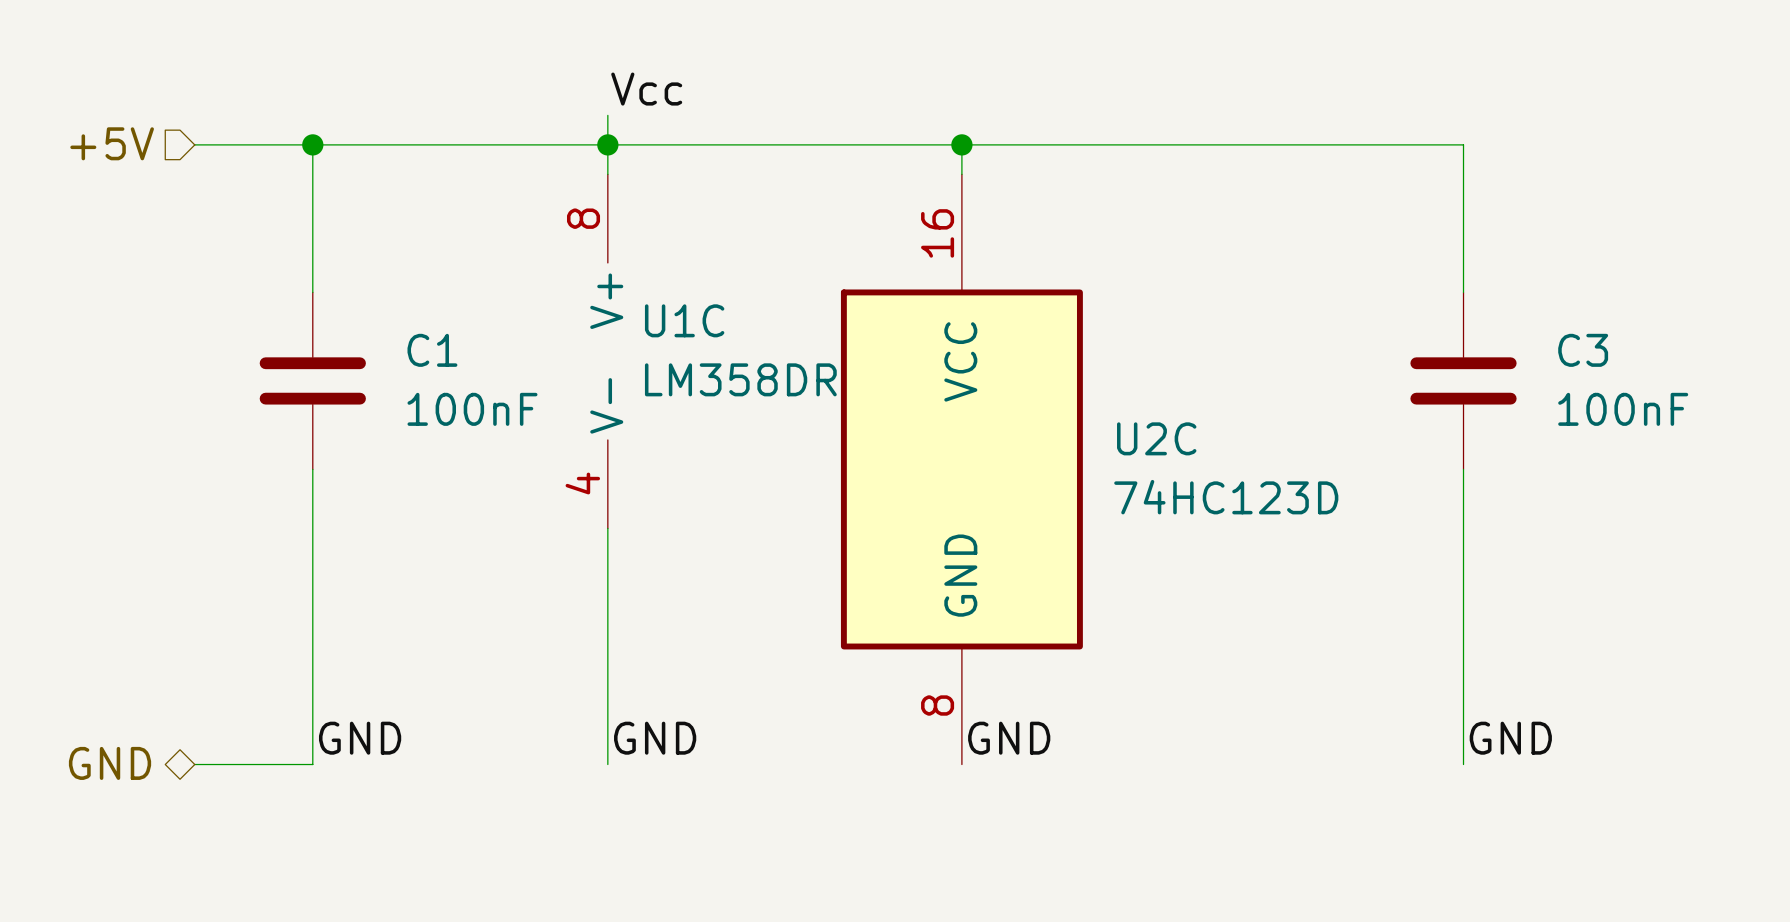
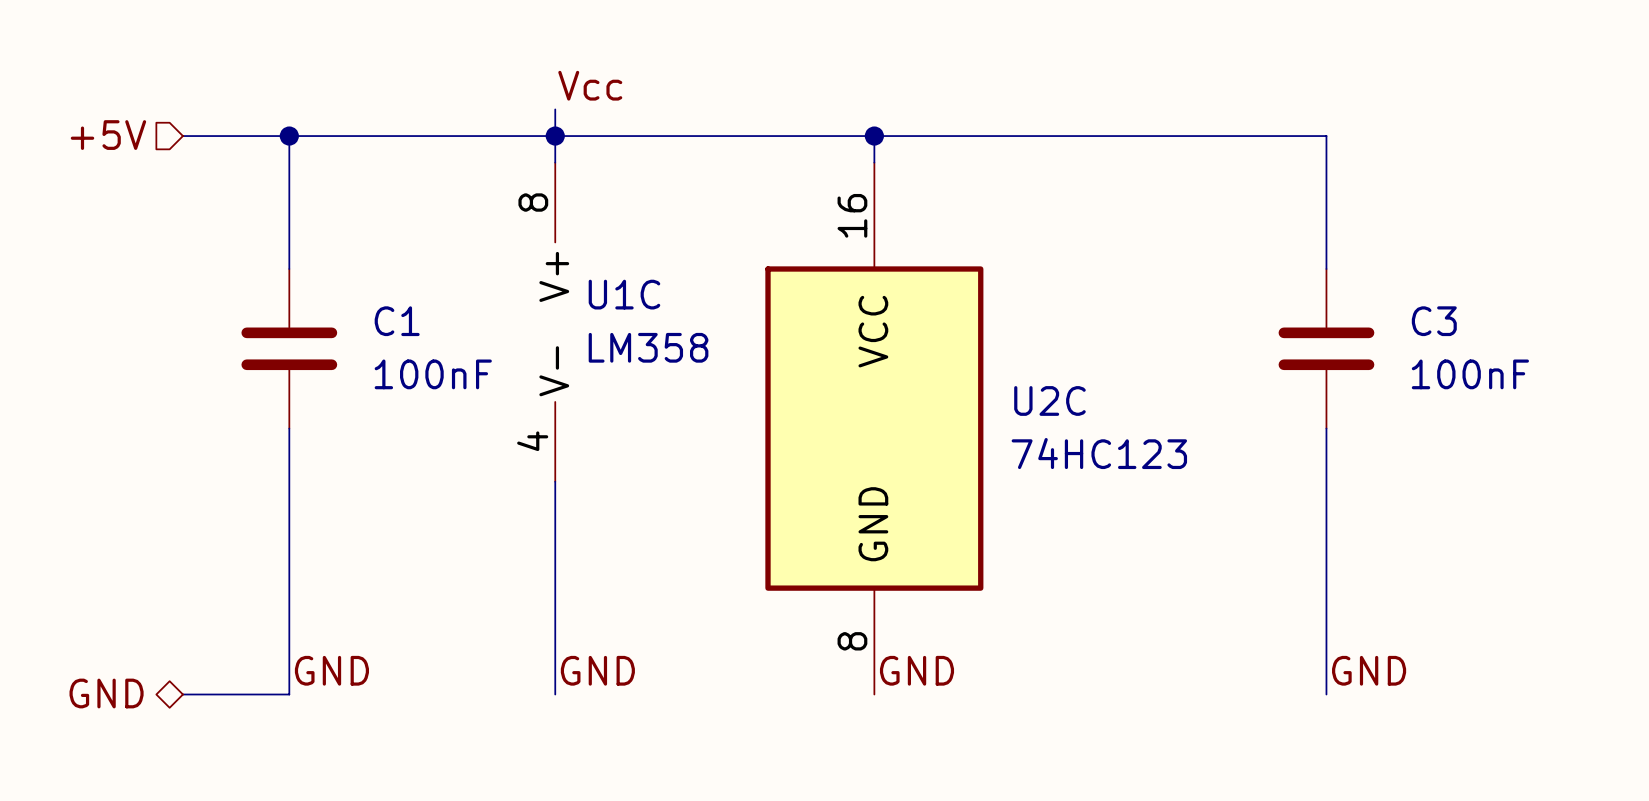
U1C value: LM358DR (740, 379) -> LM358 (648, 347)
U2C value: 74HC123D (1226, 497) -> 74HC123 (1099, 453)

